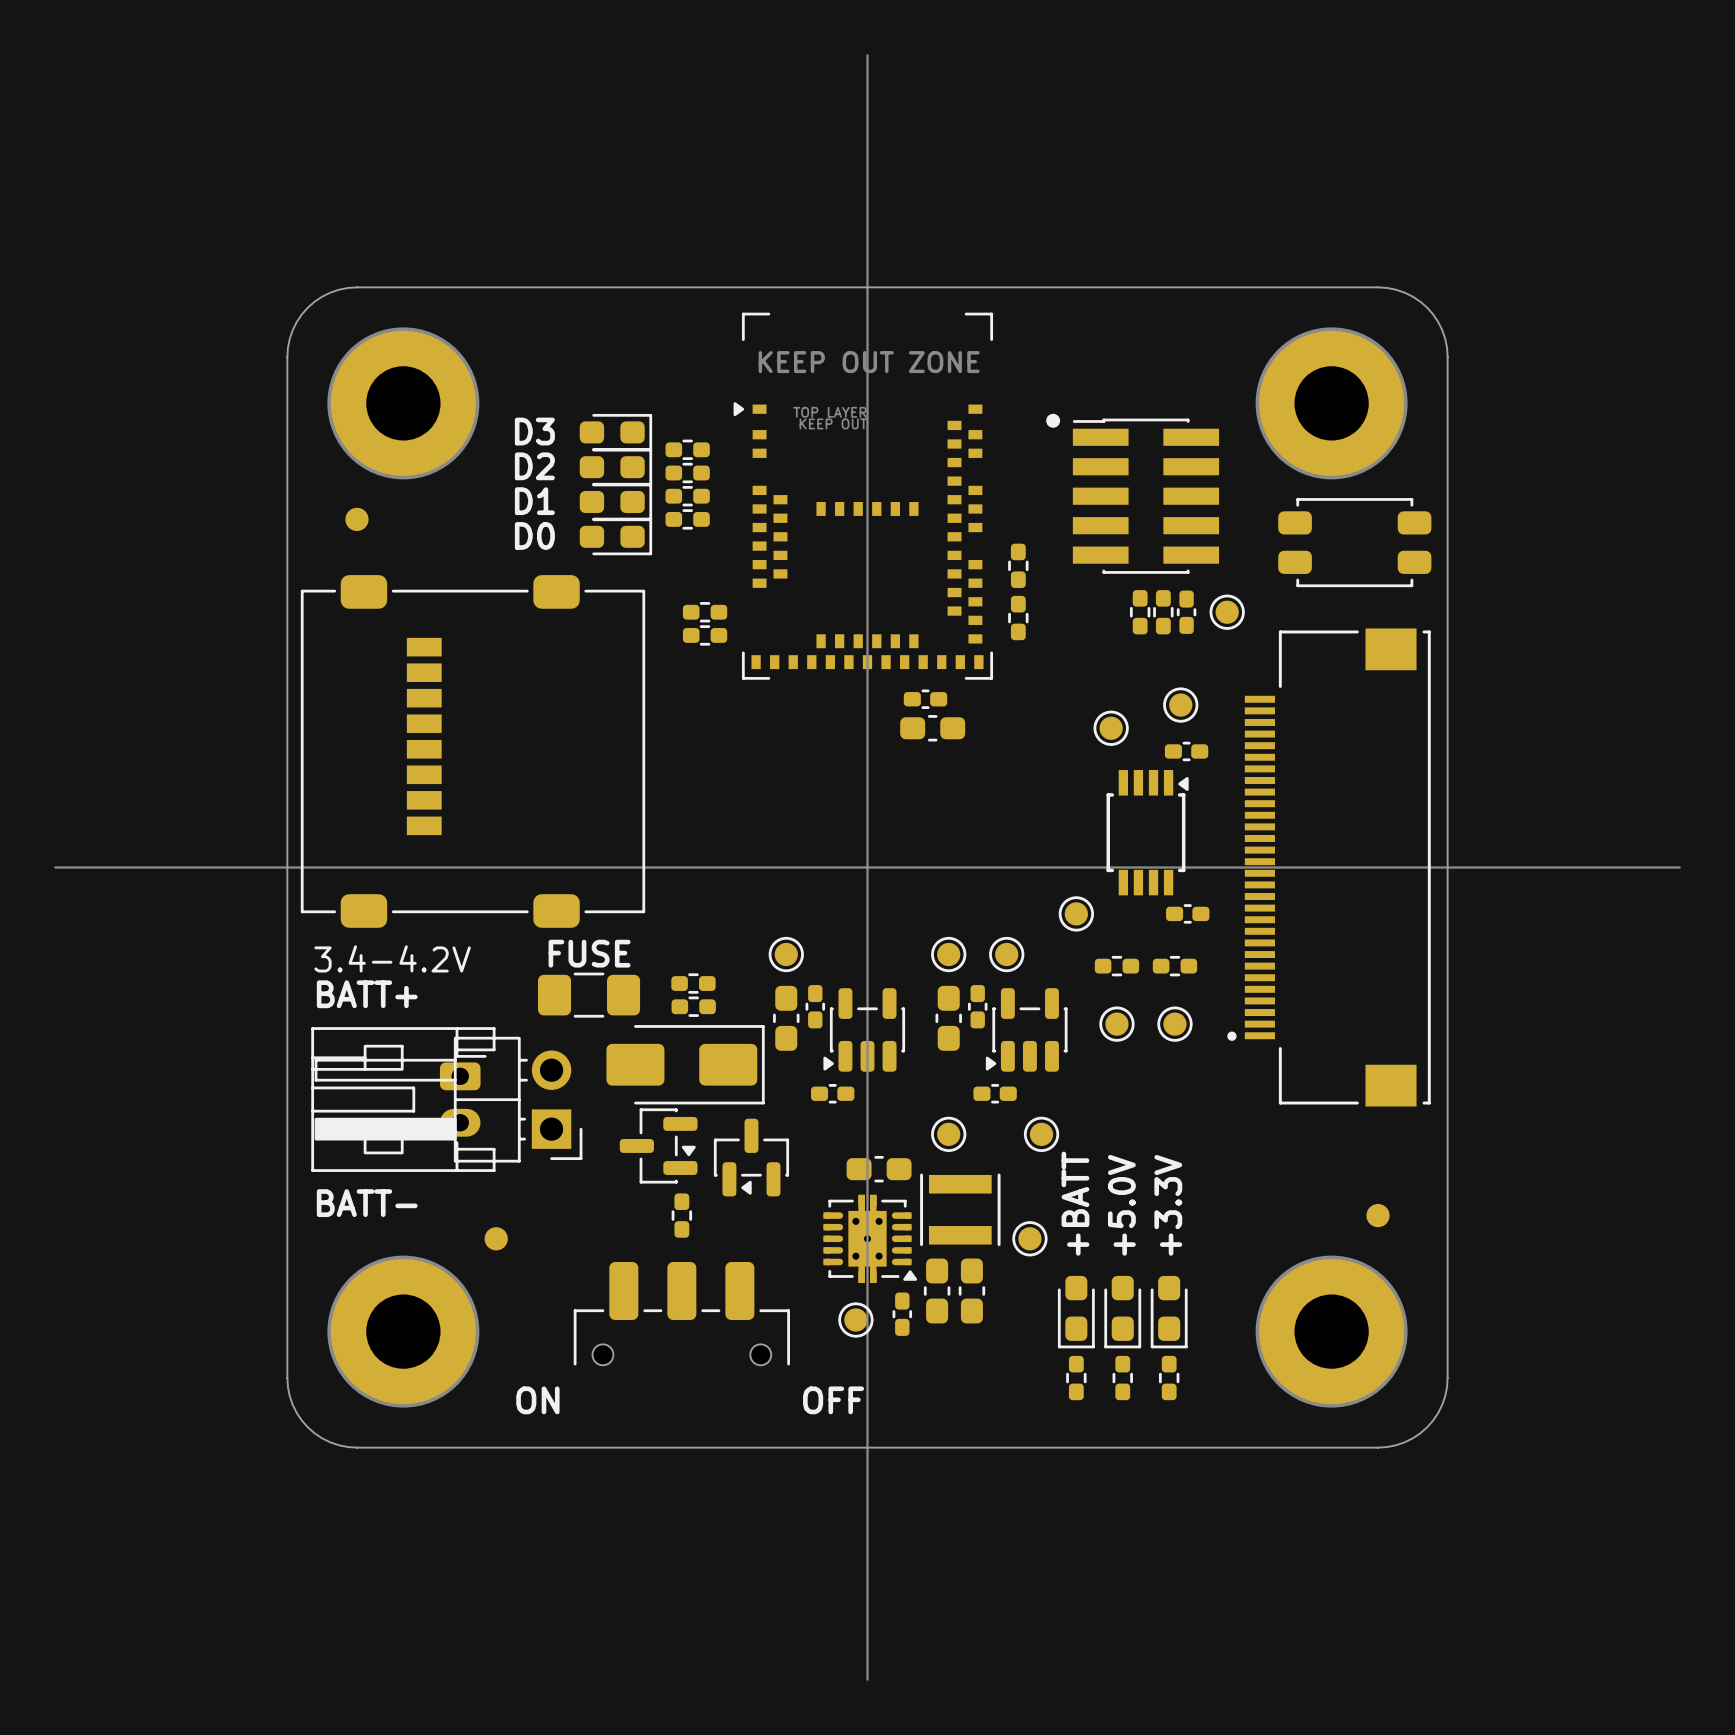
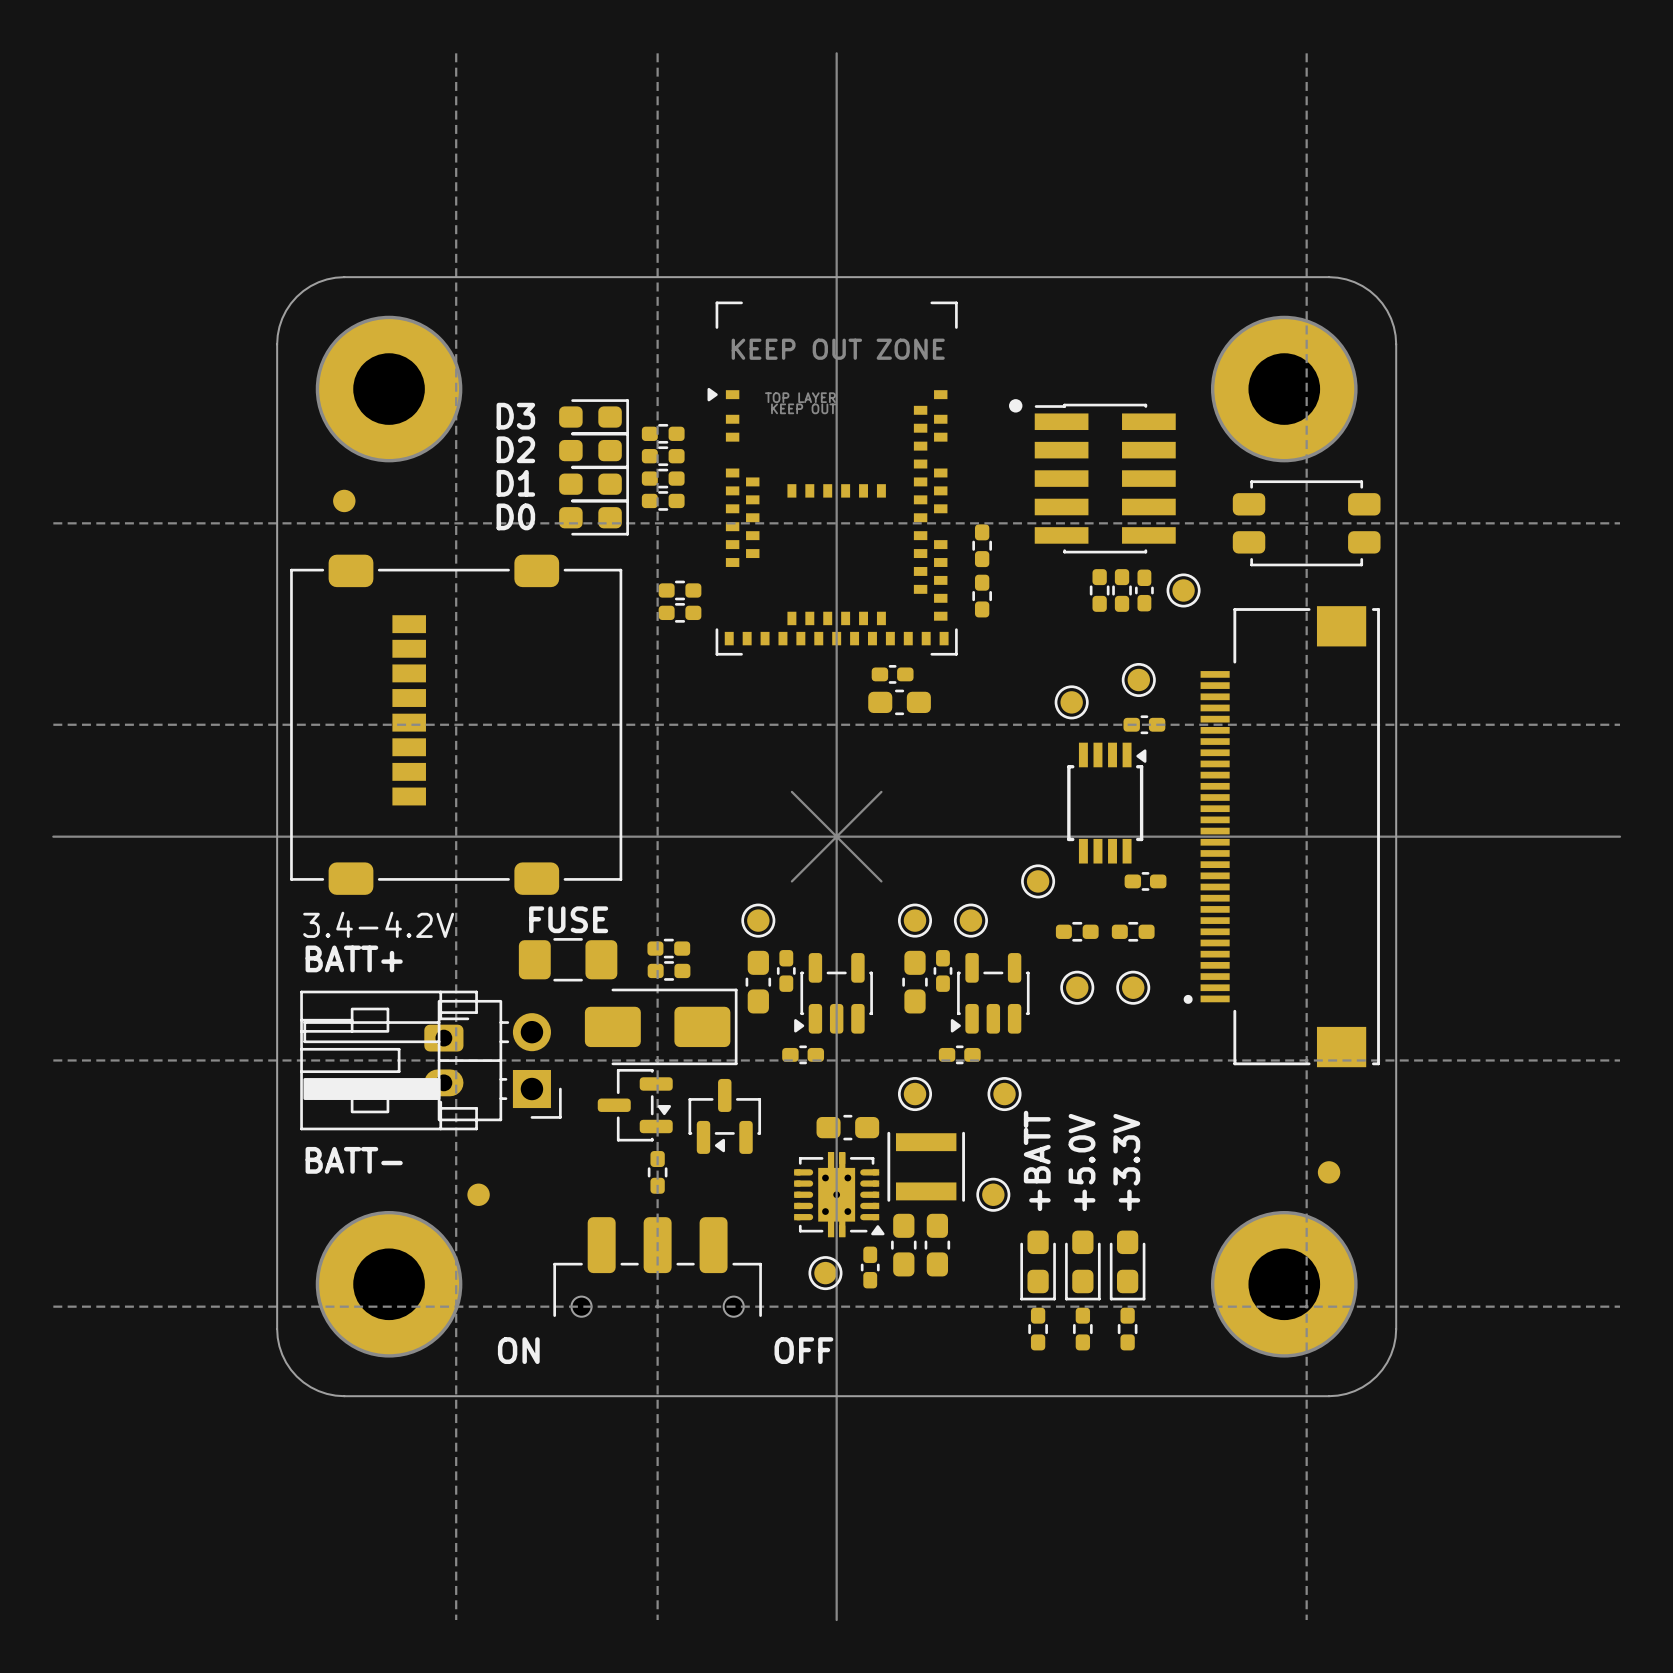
line: none -> (456, 53) (456, 1620)
line: none -> (657, 53) (657, 1620)
line: none -> (1306, 53) (1306, 1620)
line: none -> (53, 523) (1620, 523)
line: none -> (53, 724) (1620, 724)
line: none -> (791, 791) (881, 881)
line: none -> (881, 791) (791, 881)
line: none -> (53, 1060) (1620, 1060)
line: none -> (53, 1306) (1620, 1306)

